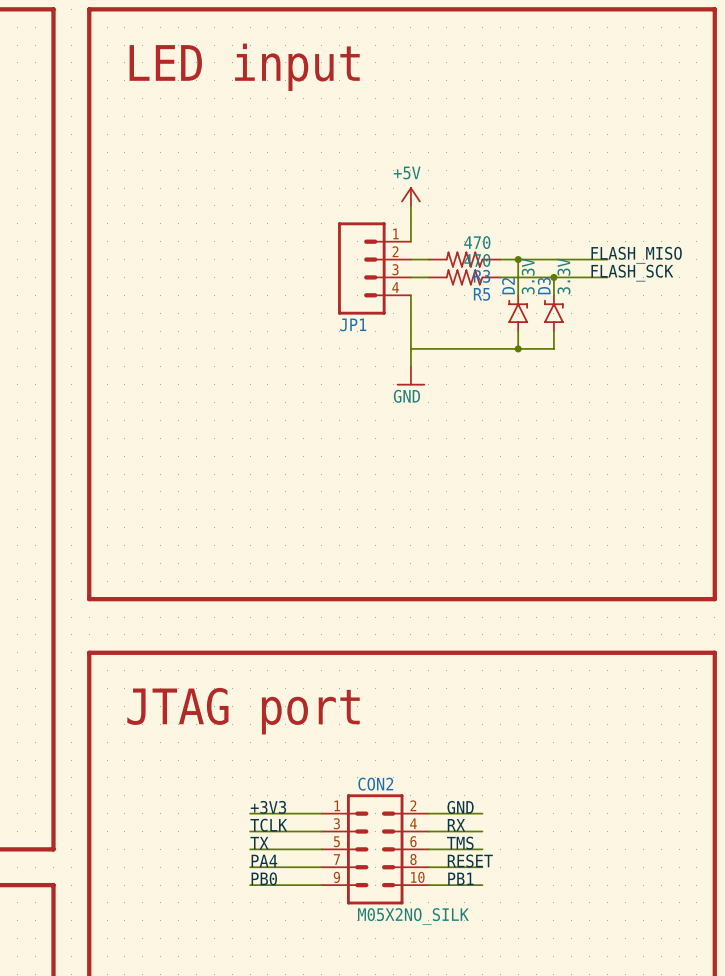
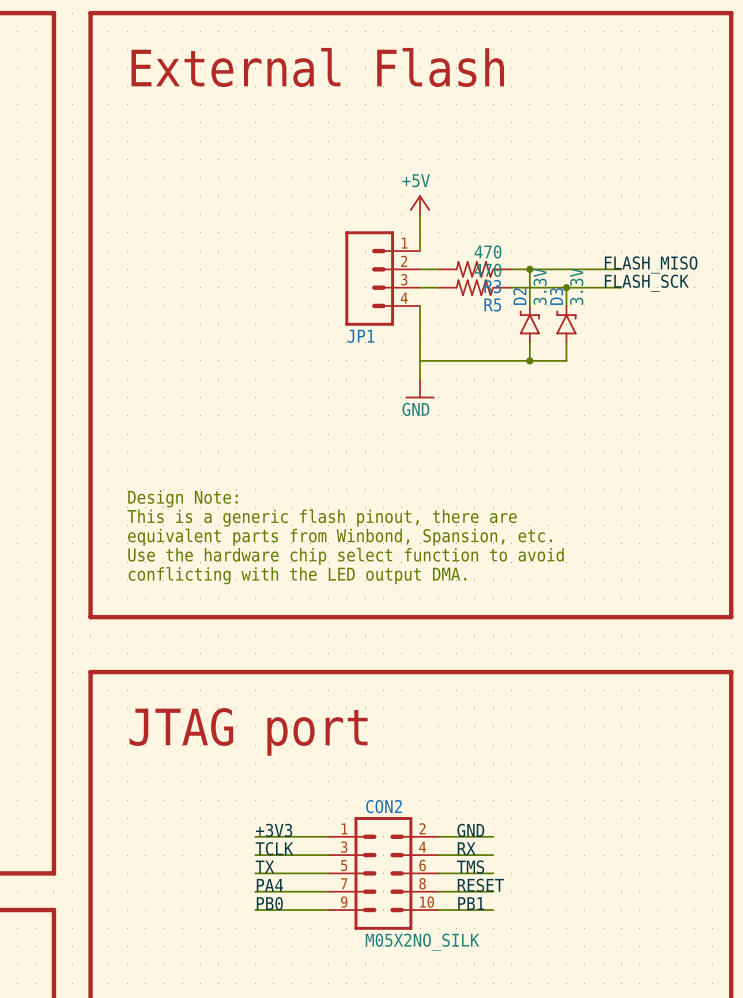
text: LED input (244, 67) -> External Flash (317, 67)
text: none -> Design Note: (182, 498)
text: none -> This is a generic flash pinout, there are (322, 518)
text: none -> equivalent parts from Winbond, Spansion, etc. (340, 537)
text: none -> Use the hardware chip select function to avoid (346, 556)
text: none -> conflicting with the LED output DMA. (297, 575)

